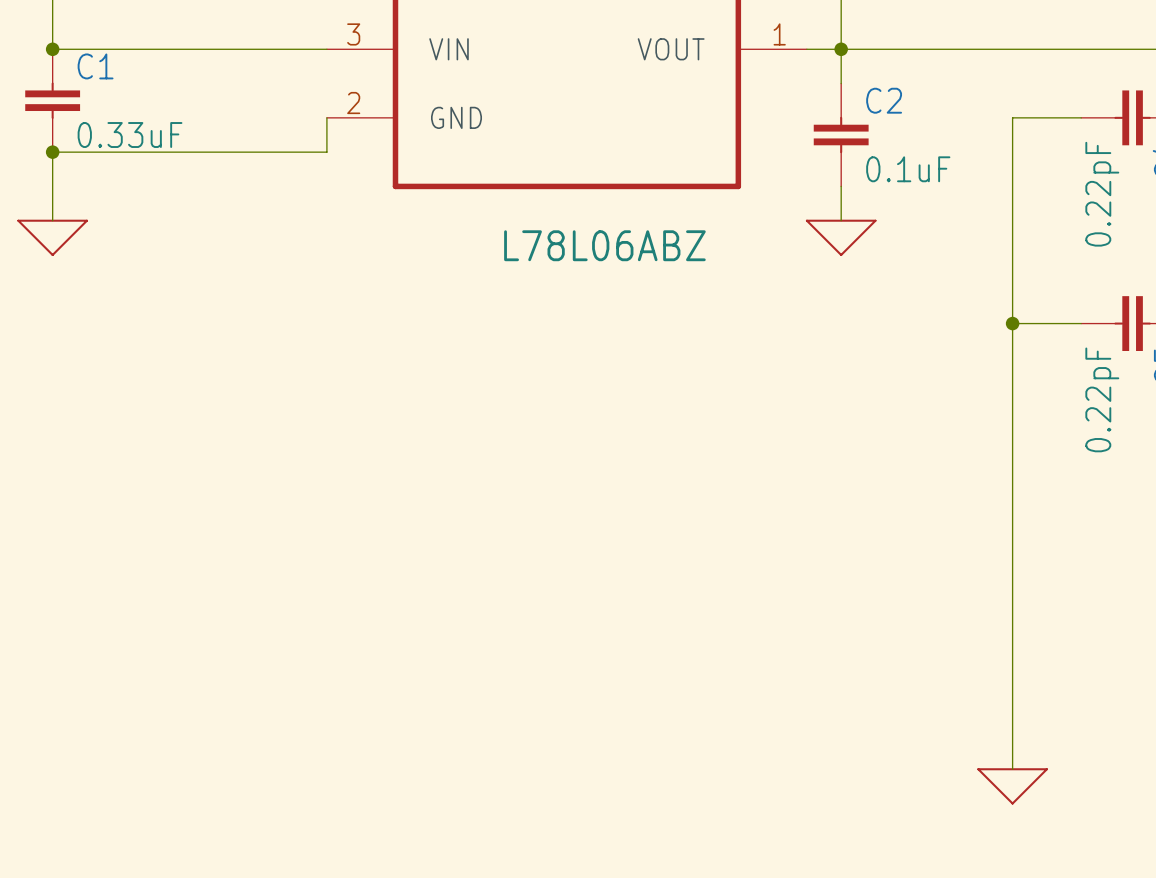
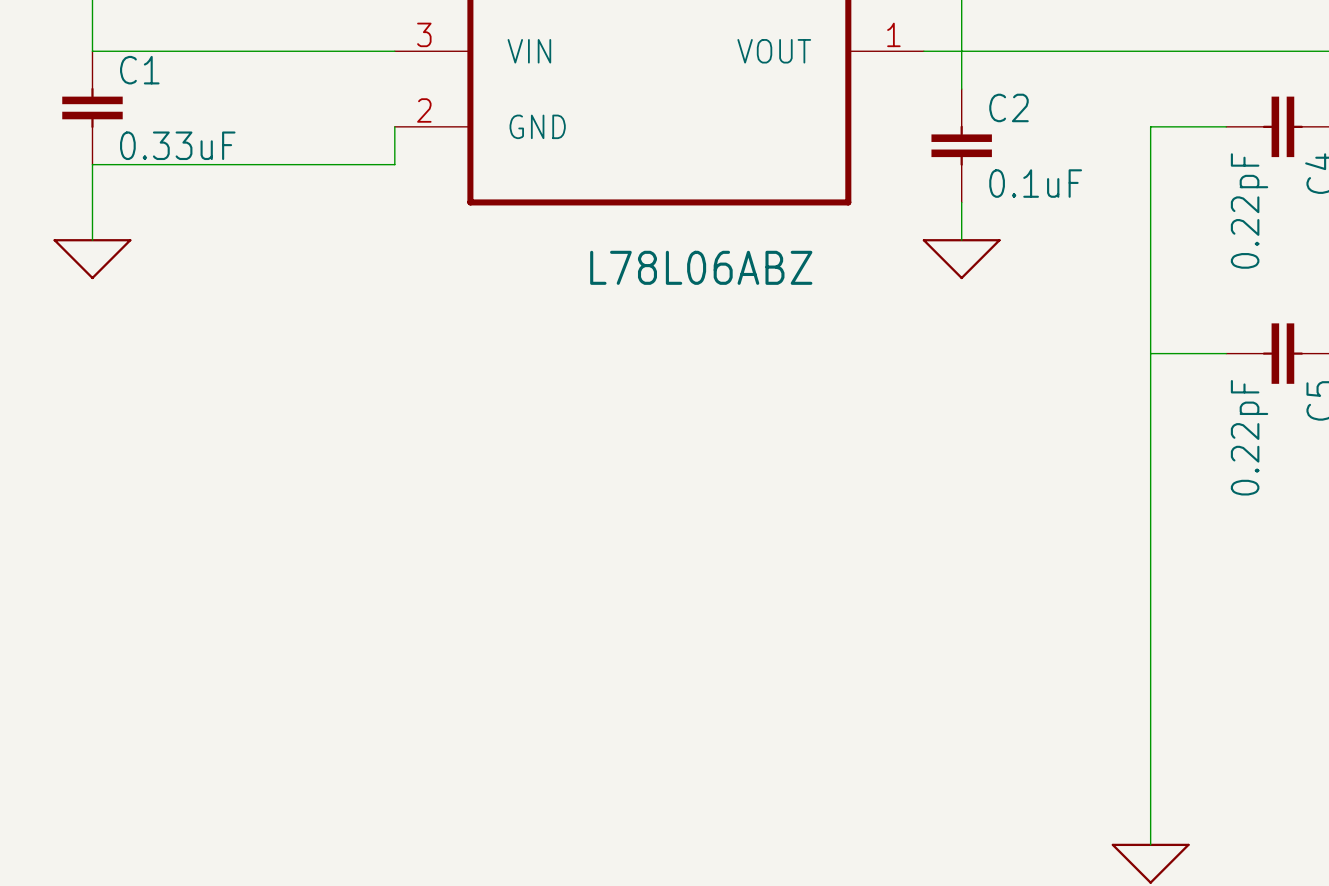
junction: (52, 49) -> none
junction: (841, 49) -> none
junction: (52, 152) -> none
junction: (1012, 323) -> none

